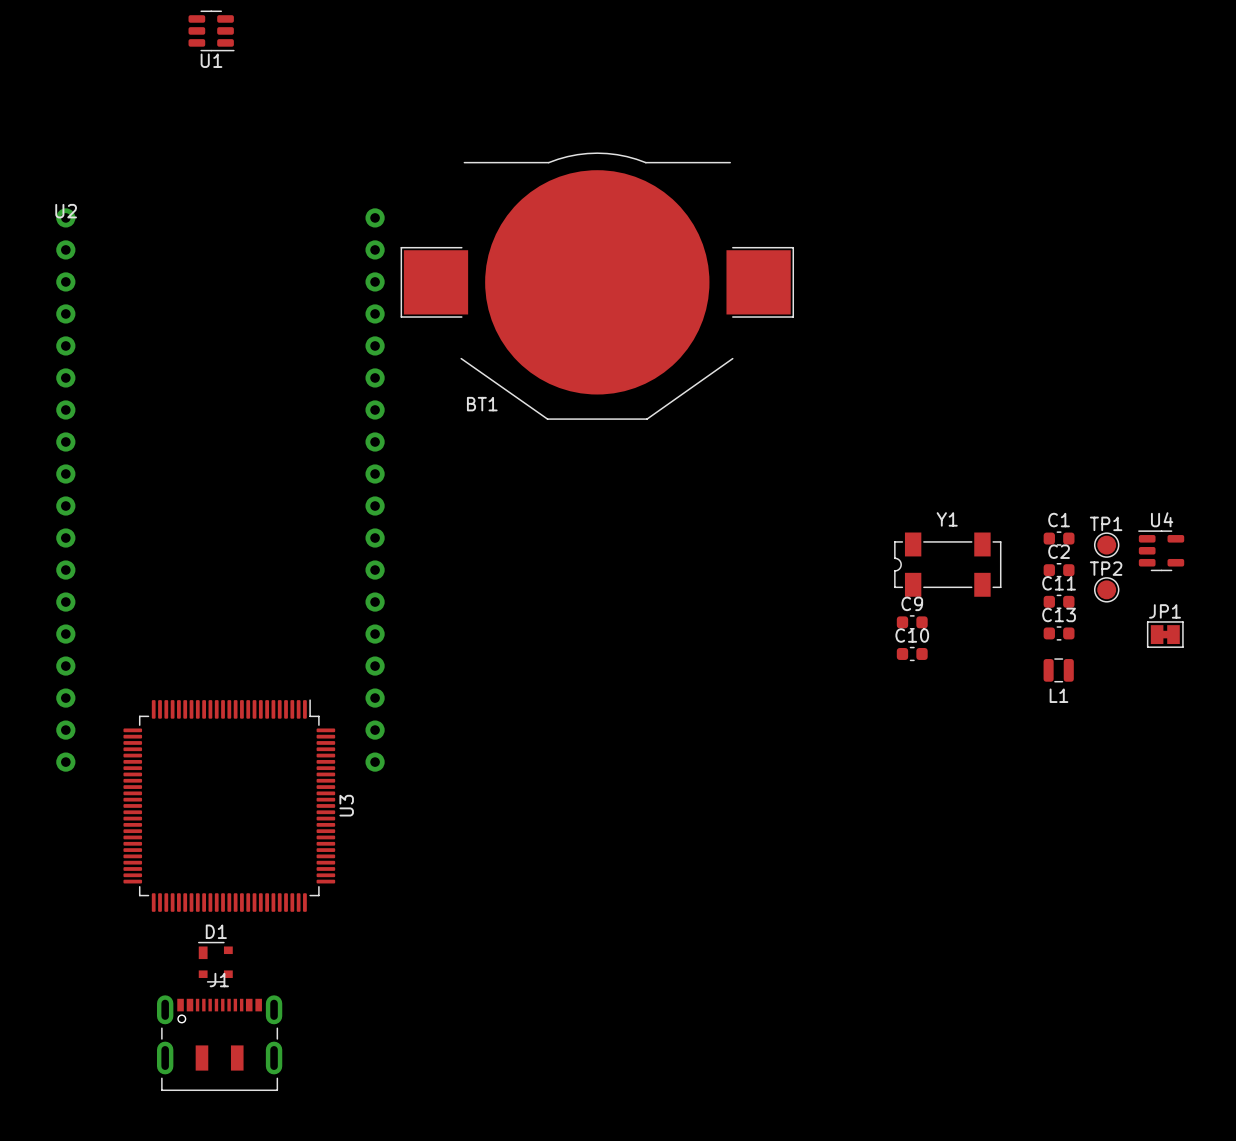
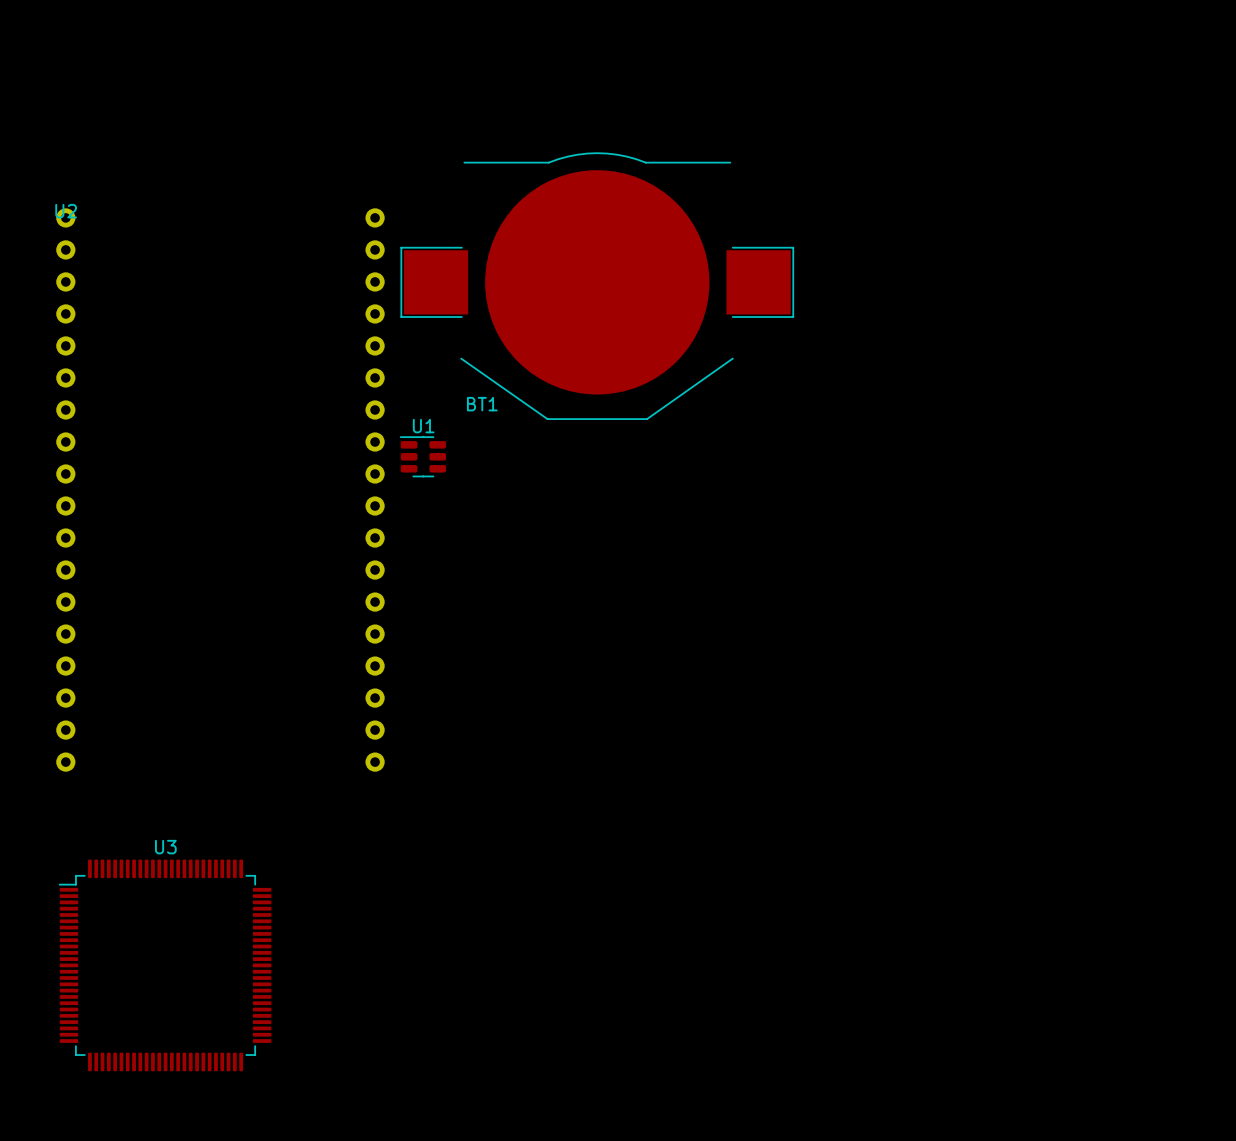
U1 rotation: 0° (211, 30) -> 180° (423, 456)
U1 position: (211, 30) -> (423, 456)
C1: (1059, 538) -> none
TP1: (1106, 545) -> none
U4: (1161, 550) -> none
Y1: (947, 564) -> none
C2: (1059, 570) -> none
TP2: (1106, 589) -> none
C11: (1059, 601) -> none
C9: (912, 622) -> none
C13: (1059, 633) -> none
JP1: (1165, 634) -> none
C10: (912, 653) -> none
L1: (1058, 670) -> none
U3 rotation: 0° (229, 805) -> 90° counterclockwise (165, 965)
U3 position: (229, 805) -> (165, 965)
D1: (215, 962) -> none
J1: (219, 1043) -> none

